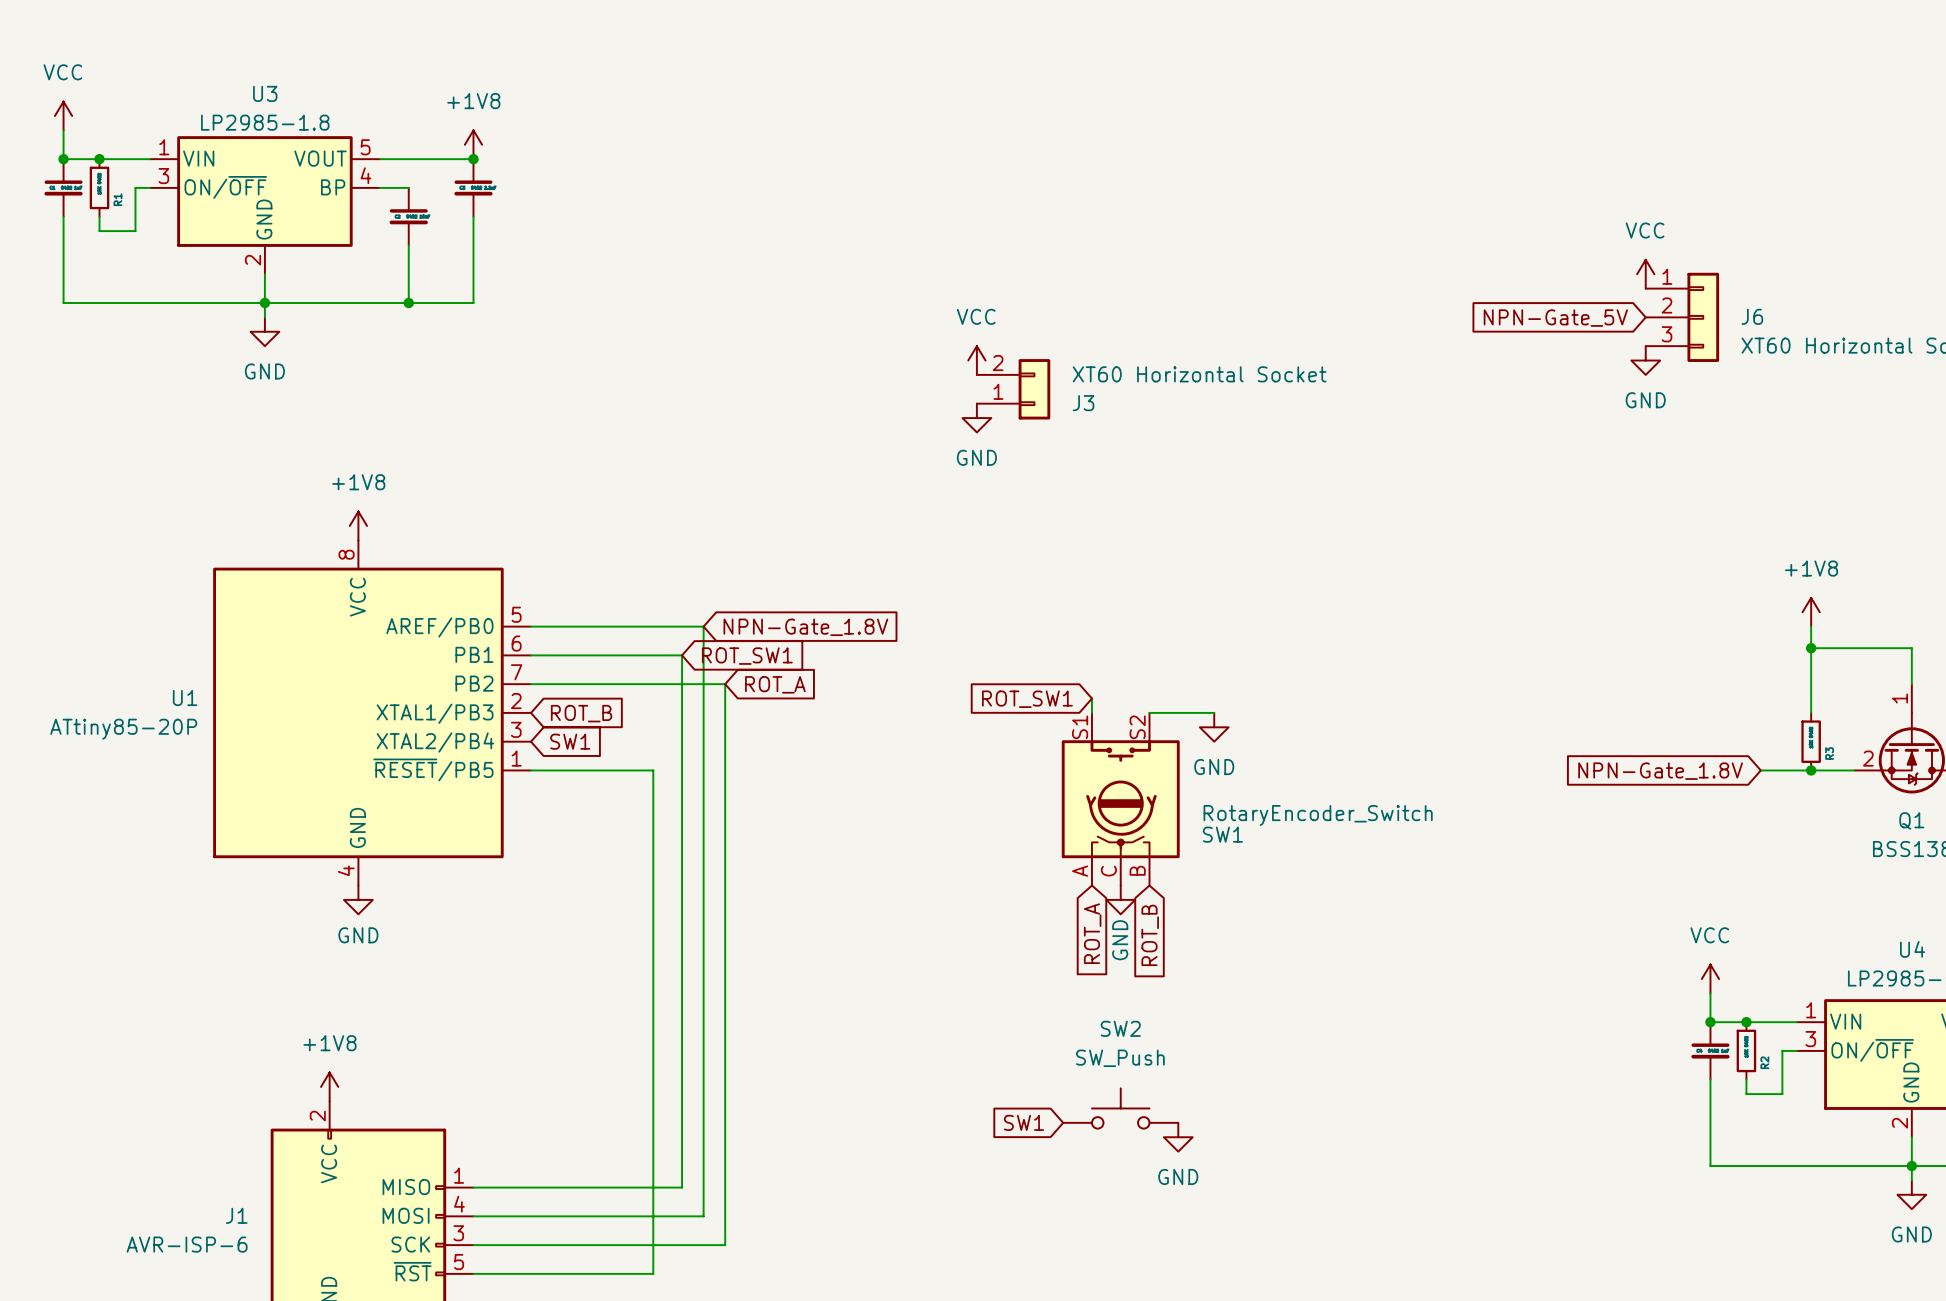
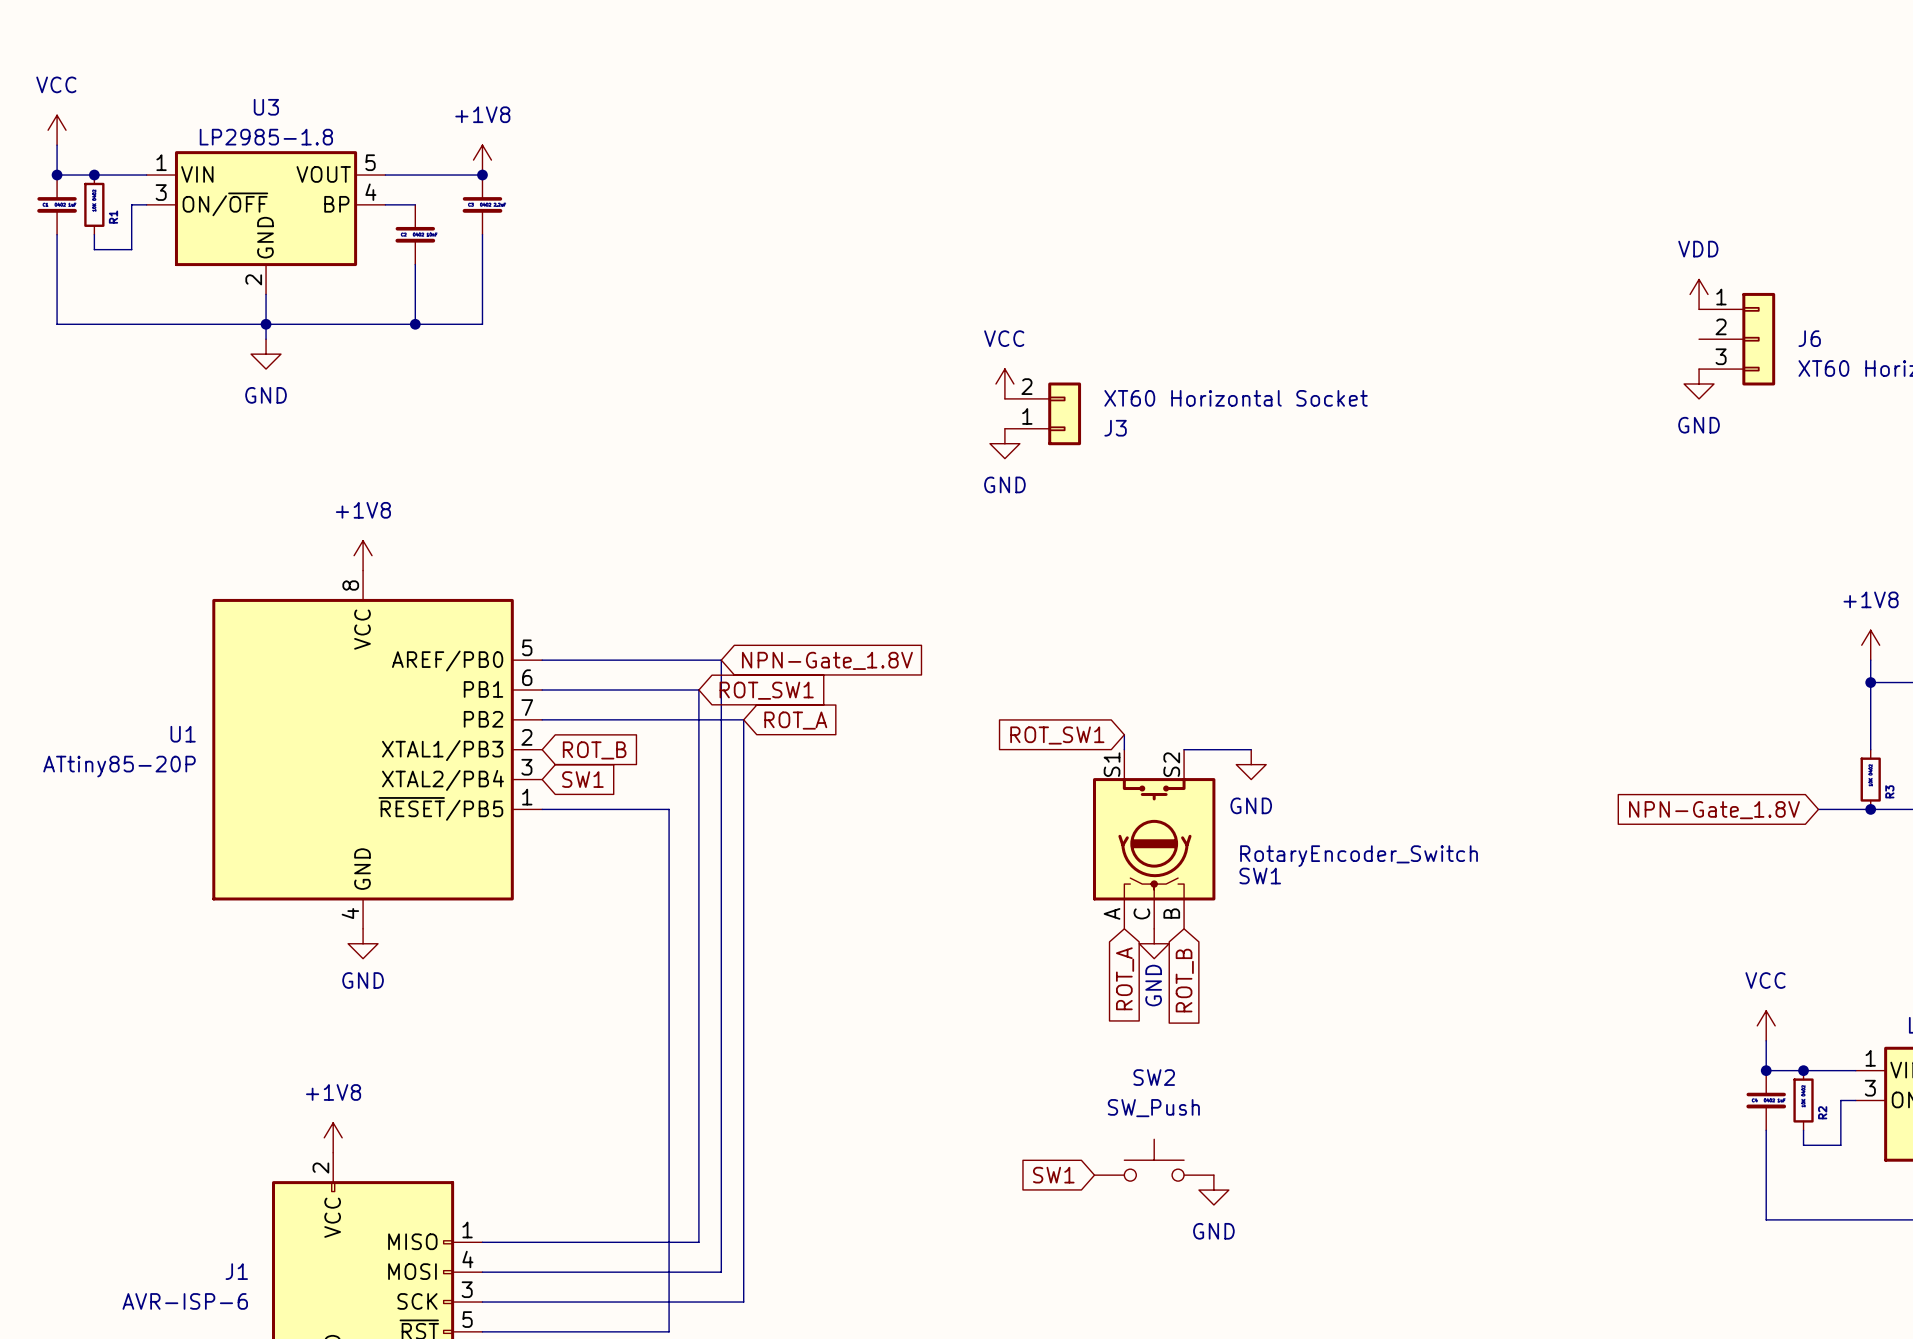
power symbol: VCC (1645, 274) -> VDD (1699, 294)
global label: NPN-Gate_5V (1555, 318) -> none

